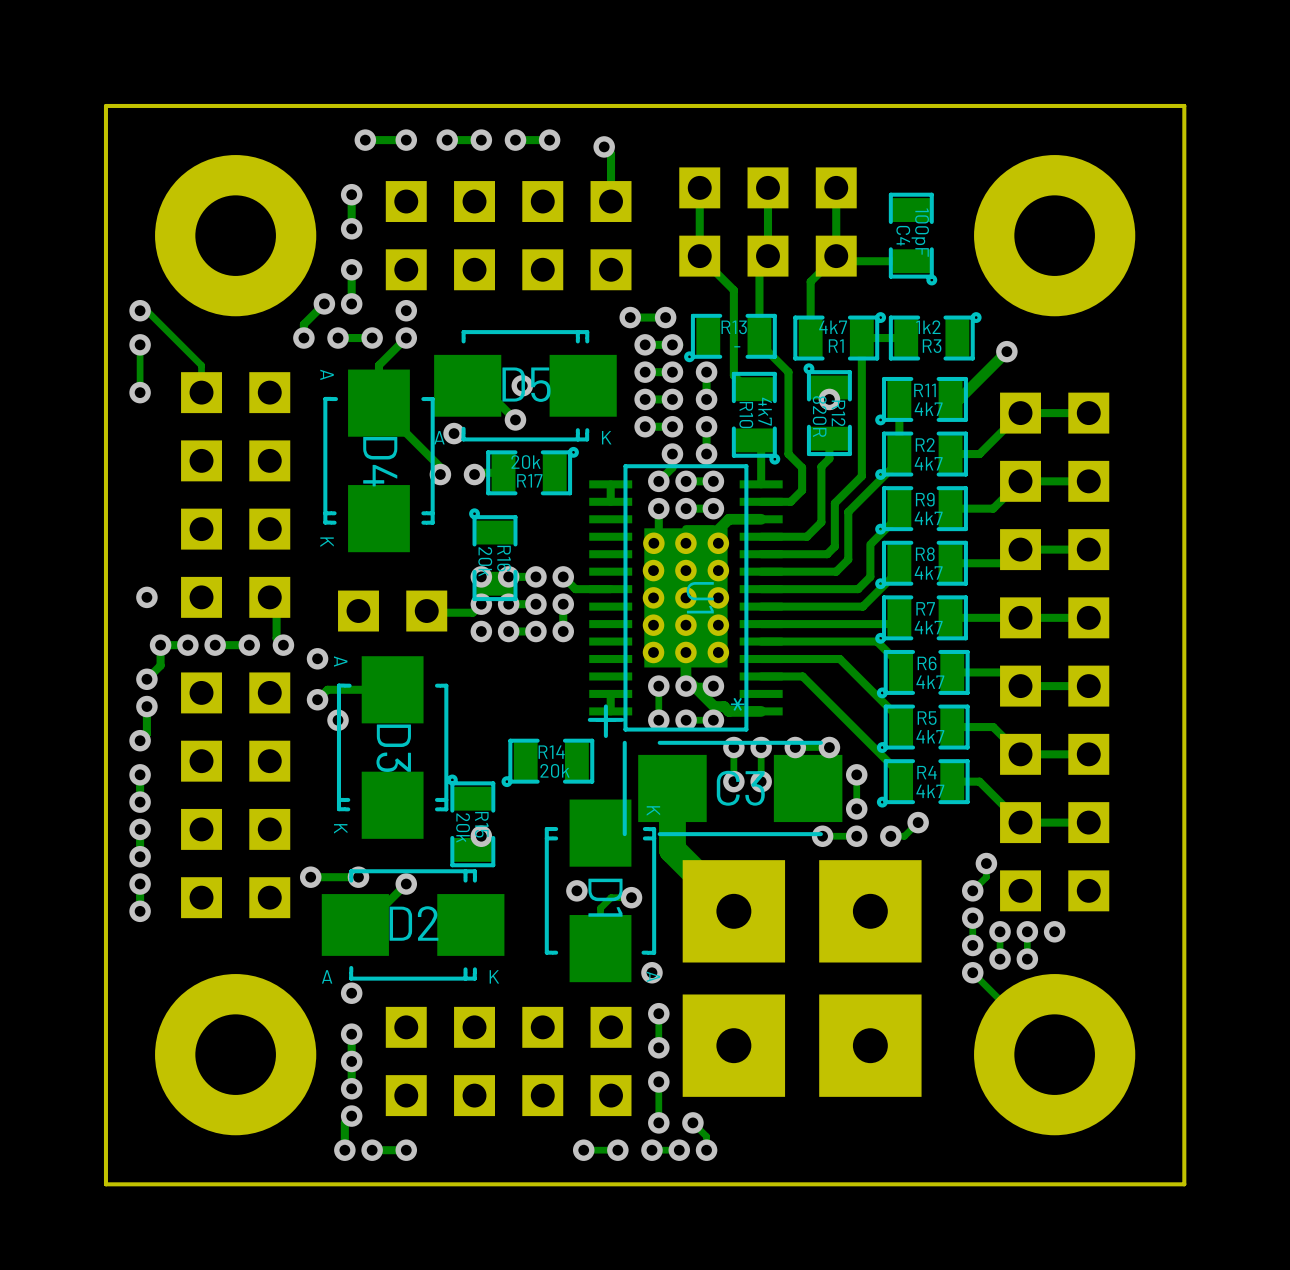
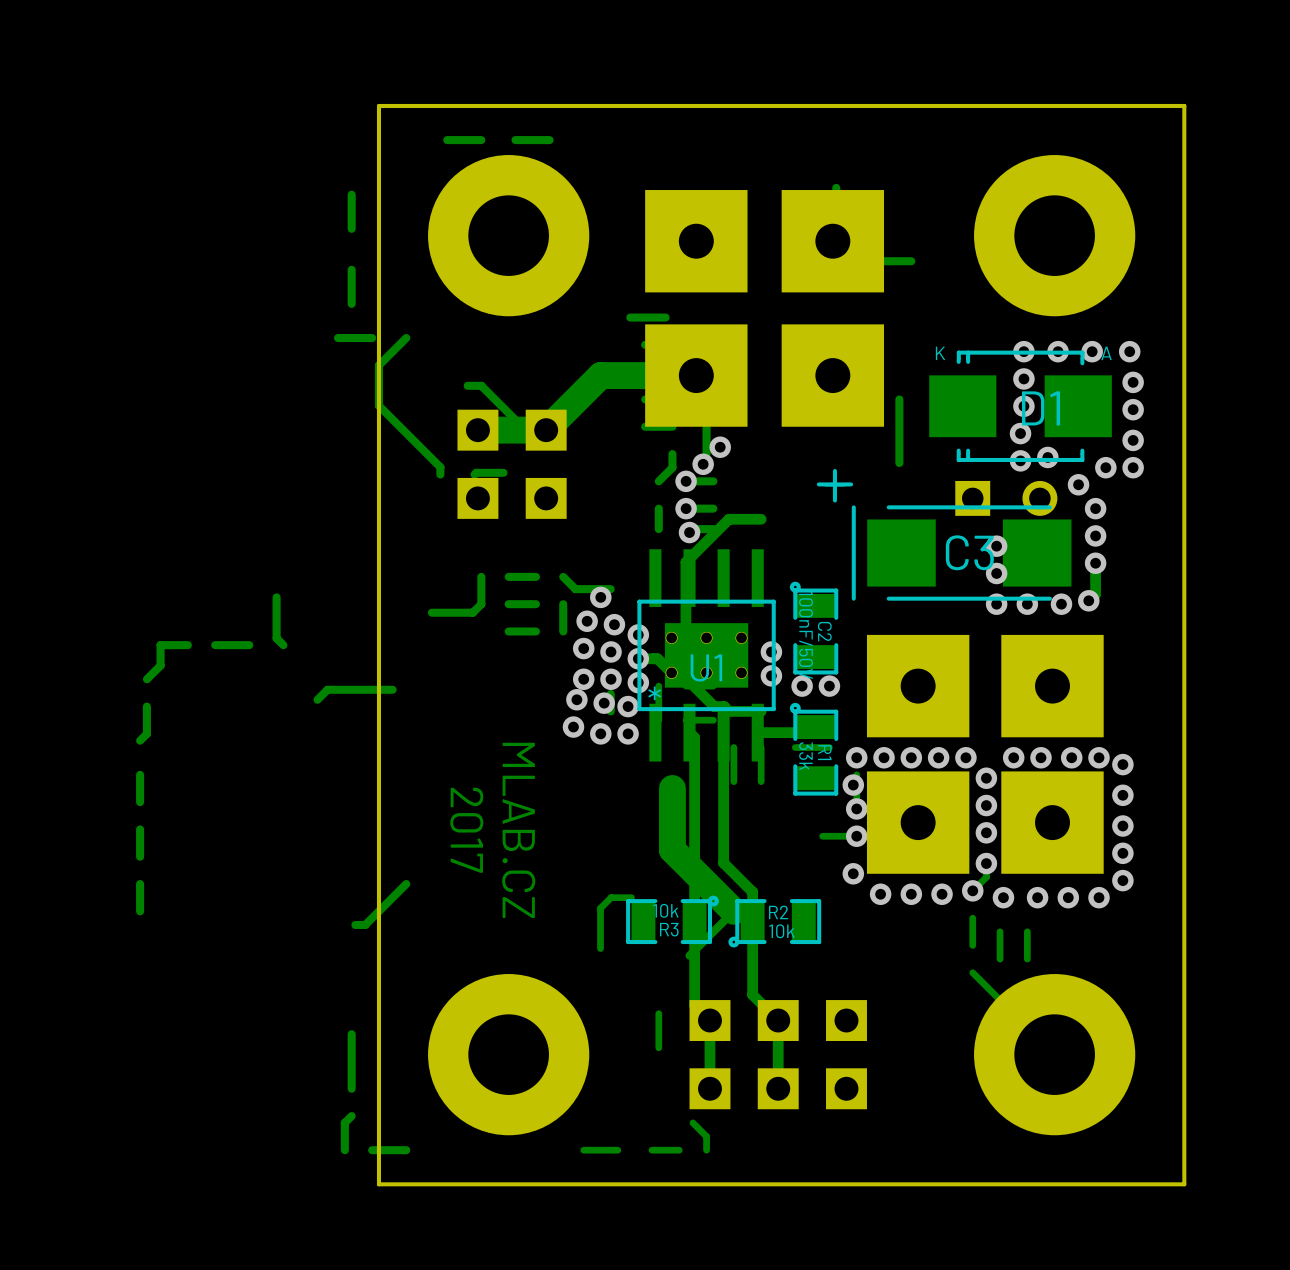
board edge: (378, 105) (105, 105) (105, 1184) (378, 1184) -> (378, 105) (378, 1184)
via: (365, 140) -> none
track: (406, 140) (365, 140) -> none
via: (406, 140) -> none
via: (447, 140) -> none
via: (481, 140) -> none
via: (515, 140) -> none
via: (549, 140) -> none
track: (604, 146) (611, 153) (611, 201) -> none
via: (604, 146) -> none
part footprint: [385, 181, 632, 291] -> [428, 155, 590, 317]
track: (699, 187) (699, 256) (733, 290) (733, 375) (747, 389) (754, 389) -> none
track: (768, 187) (768, 256) (759, 264) (759, 343) (788, 372) (788, 454) (802, 467) (802, 490) (790, 501) (761, 501) -> none
via: (351, 194) -> none
part: (699, 222) -> none
part: (768, 222) -> none
part: (836, 222) -> none
via: (351, 228) -> none
part: (235, 235) -> none
C4: 100pF (913, 239) -> none
track: (836, 256) (810, 281) (810, 338) -> none
via: (351, 269) -> none
track: (324, 303) (303, 324) (303, 338) -> none
via: (324, 303) -> none
via: (351, 303) -> none
part: none -> (696, 308)
part: none -> (832, 308)
track: (140, 310) (146, 310) (201, 365) (201, 392) -> none
via: (140, 310) -> none
via: (406, 310) -> none
via: (630, 317) -> none
via: (665, 317) -> none
R1 value: 4k7 (833, 327) -> 33k (805, 756)
R3 value: 1k2 (928, 327) -> 10k (665, 910)
R1 rotation: 0° (839, 336) -> 90° counterclockwise (814, 749)
R1 position: (839, 336) -> (814, 749)
R3 position: (935, 336) -> (672, 919)
via: (303, 338) -> none
via: (338, 338) -> none
via: (372, 338) -> none
via: (406, 338) -> none
R13: - (730, 338) -> none
track: (906, 338) (861, 338) (861, 476) (834, 503) (834, 546) (827, 554) (761, 554) -> none
track: (140, 344) (140, 392) -> none
via: (140, 344) -> none
via: (645, 344) -> none
via: (672, 344) -> none
track: (1006, 351) (959, 399) (950, 399) -> none
via position: (1006, 351) -> (1023, 351)
via: none -> (1058, 351)
via: none -> (1092, 351)
via: none -> (1129, 351)
via: (645, 372) -> none
via: (672, 372) -> none
via: (706, 372) -> none
track: none -> (696, 375) (600, 375) (546, 430) (477, 430)
via: none -> (1023, 378)
via: none -> (1133, 382)
via: (522, 385) -> none
D5: (525, 385) -> none
via: (140, 392) -> none
via: (645, 399) -> none
via: (672, 399) -> none
via: (706, 399) -> none
via: (829, 399) -> none
R11: 4k7 (921, 401) -> none
via: none -> (1023, 406)
R12: 820R (827, 409) -> none
via: none -> (1133, 409)
part: (1054, 413) -> none
track: (1088, 413) (1020, 413) (979, 454) (950, 454) -> none
R10: 4k7 (756, 418) -> none
via: (515, 419) -> none
via: (645, 426) -> none
via: (672, 426) -> none
via: (706, 426) -> none
part: none -> (512, 430)
via: (454, 433) -> none
via: none -> (1020, 433)
track: (829, 438) (829, 458) (821, 466) (821, 522) (806, 536) (761, 536) -> none
track: (754, 440) (761, 447) (761, 484) -> none
via: none -> (1133, 440)
via: none -> (720, 447)
via: (672, 454) -> none
via: (706, 454) -> none
R2 position: (921, 455) -> (774, 923)
via: none -> (1047, 457)
D4: (378, 460) -> none
track: (899, 460) (848, 511) (848, 559) (836, 571) (761, 571) -> none
via: none -> (1020, 460)
R2 value: 4k7 (928, 463) -> 10k (781, 931)
U1 footprint: [589, 464, 783, 732] -> [637, 549, 776, 762]
via: none -> (703, 464)
via: none -> (1105, 467)
via: none -> (1133, 467)
R17: 20k (532, 471) -> none
via: (440, 474) -> none
via: (474, 474) -> none
via: (658, 481) -> none
via: (713, 481) -> none
part: (1054, 481) -> none
track: (1088, 481) (1020, 481) (993, 508) (950, 508) -> none
track: (610, 484) (610, 501) -> none
via: none -> (1078, 484)
part: (235, 495) -> none
part: none -> (512, 498)
part: none -> (1006, 498)
via: (658, 508) -> none
via: (713, 508) -> none
track: (899, 508) (899, 515) (870, 544) (870, 576) (858, 589) (761, 589) -> none
via: none -> (1095, 508)
R9: 4k7 (921, 510) -> none
via: none -> (689, 532)
via: none -> (1095, 535)
via: none -> (996, 546)
part: (1054, 549) -> none
track: (1088, 549) (1020, 549) (1006, 563) (950, 563) -> none
R16: 20k (493, 554) -> none
track: (899, 563) (899, 570) (862, 606) (761, 606) -> none
track: none -> (1095, 563) (1095, 593) (1088, 600)
via: none -> (1095, 563)
R8: 4k7 (921, 564) -> none
via: none -> (996, 573)
via: (481, 576) -> none
via: (508, 576) -> none
via: (535, 576) -> none
via: (563, 576) -> none
via: (146, 597) -> none
via: none -> (600, 597)
via: none -> (1088, 600)
via: (481, 604) -> none
via: (508, 604) -> none
via: (535, 604) -> none
via: (563, 604) -> none
via: none -> (996, 604)
via: none -> (1027, 604)
via: none -> (1061, 604)
part: (392, 611) -> none
track: (899, 617) (893, 624) (761, 624) -> none
part: (1054, 617) -> none
track: (1088, 617) (950, 617) -> none
R7: 4k7 (921, 619) -> none
via: none -> (587, 621)
via: none -> (614, 624)
C2: none -> 100nF/50V (814, 628)
via: (481, 631) -> none
via: (508, 631) -> none
via: (535, 631) -> none
via position: (563, 631) -> (583, 648)
via: none -> (638, 634)
track: (761, 641) (877, 641) (901, 665) (901, 672) -> none
via: (160, 645) -> none
via: (187, 645) -> none
via: (215, 645) -> none
via: (249, 645) -> none
via: (283, 645) -> none
via: none -> (611, 651)
via: none -> (771, 651)
via: (317, 658) -> none
track: none -> (638, 658) (657, 658) (671, 672)
via: none -> (638, 658)
track: (761, 659) (839, 659) (901, 720) (901, 727) -> none
track: (952, 672) (1006, 672) (1020, 686) (1088, 686) -> none
R6: 4k7 (923, 674) -> none
via: none -> (771, 675)
track: (761, 676) (802, 676) (901, 774) (901, 781) -> none
via: (146, 679) -> none
via: none -> (583, 679)
via: none -> (611, 679)
via position: (658, 686) -> (638, 682)
via: (686, 686) -> none
via: (713, 686) -> none
via: none -> (802, 686)
via: none -> (829, 686)
part: none -> (985, 686)
part: (1054, 686) -> none
via: (317, 699) -> none
via: none -> (576, 699)
via: none -> (604, 703)
via: (146, 706) -> none
via: none -> (628, 706)
via: (338, 720) -> none
via: (658, 720) -> none
via: (686, 720) -> none
via: (713, 720) -> none
via: none -> (573, 727)
track: none -> (815, 727) (810, 732) (757, 732)
track: (952, 727) (993, 727) (1020, 754) (1088, 754) -> none
R5: 4k7 (923, 728) -> none
track: none -> (689, 732) (694, 737) (694, 1005) (709, 1020) (709, 1088)
track: none -> (723, 732) (723, 863) (752, 892) (752, 994) (778, 1020) (778, 1088)
via: none -> (600, 733)
via: none -> (628, 733)
via: (140, 740) -> none
D3: (392, 747) -> none
via: (733, 747) -> none
via: (761, 747) -> none
via: (795, 747) -> none
via: (829, 747) -> none
part: (1054, 754) -> none
via: none -> (856, 757)
via: none -> (884, 757)
via: none -> (911, 757)
via: none -> (938, 757)
via: none -> (965, 757)
via: none -> (1013, 757)
via: none -> (1041, 757)
via: none -> (1071, 757)
via: none -> (1099, 757)
R14: 20k (547, 762) -> none
via: none -> (1122, 764)
C3 position: (715, 770) -> (944, 534)
via: (140, 774) -> none
via: (856, 774) -> none
via: none -> (986, 778)
via: (733, 781) -> none
via: (761, 781) -> none
track: (952, 781) (979, 781) (1020, 822) (1052, 822) -> none
R4: 4k7 (923, 783) -> none
via: none -> (853, 785)
part: (235, 795) -> none
via: none -> (1122, 795)
via: (140, 802) -> none
via: none -> (986, 805)
R15: 20k (471, 820) -> none
via: (918, 822) -> none
part: none -> (985, 822)
part: (1054, 822) -> none
via: none -> (1122, 826)
via: (140, 829) -> none
text: none -> 2017 (466, 830)
text: none -> MLAB.CZ (518, 830)
via: none -> (986, 832)
via: (481, 836) -> none
via: (822, 836) -> none
via: (890, 836) -> none
via: none -> (1122, 853)
via: (140, 856) -> none
via: none -> (853, 873)
via: (310, 877) -> none
track: (358, 877) (310, 877) -> none
via: (358, 877) -> none
via: none -> (1122, 880)
via: (140, 884) -> none
via: (406, 884) -> none
via: (576, 890) -> none
D1 rotation: 0° (600, 890) -> 90° counterclockwise (1020, 406)
D1 position: (600, 890) -> (1020, 406)
part: (1054, 890) -> none
via: none -> (880, 894)
via: none -> (911, 894)
via: none -> (942, 894)
via: (631, 897) -> none
via: none -> (1003, 897)
via: none -> (1037, 897)
via: none -> (1068, 897)
via: none -> (1099, 897)
via: (140, 911) -> none
via: (972, 918) -> none
D2: (413, 924) -> none
via: (1000, 931) -> none
via: (1027, 931) -> none
via: (1054, 931) -> none
via: (972, 945) -> none
via: (1000, 959) -> none
via: (1027, 959) -> none
via: (651, 972) -> none
via: (972, 972) -> none
part: (733, 978) -> none
part: (870, 978) -> none
via: (351, 993) -> none
part footprint: [385, 1006, 632, 1117] -> [428, 974, 590, 1136]
via: (658, 1013) -> none
via: (351, 1034) -> none
via: (658, 1047) -> none
part: (235, 1054) -> none
part: none -> (709, 1054)
part: none -> (778, 1054)
part: none -> (846, 1054)
via: (351, 1061) -> none
track: (658, 1081) (658, 1122) -> none
via: (658, 1081) -> none
via: (351, 1088) -> none
via: (351, 1116) -> none
via: (658, 1122) -> none
via: (692, 1122) -> none
via: (344, 1150) -> none
via: (372, 1150) -> none
via: (406, 1150) -> none
via: (583, 1150) -> none
via: (617, 1150) -> none
via: (651, 1150) -> none
via: (679, 1150) -> none
via: (706, 1150) -> none

